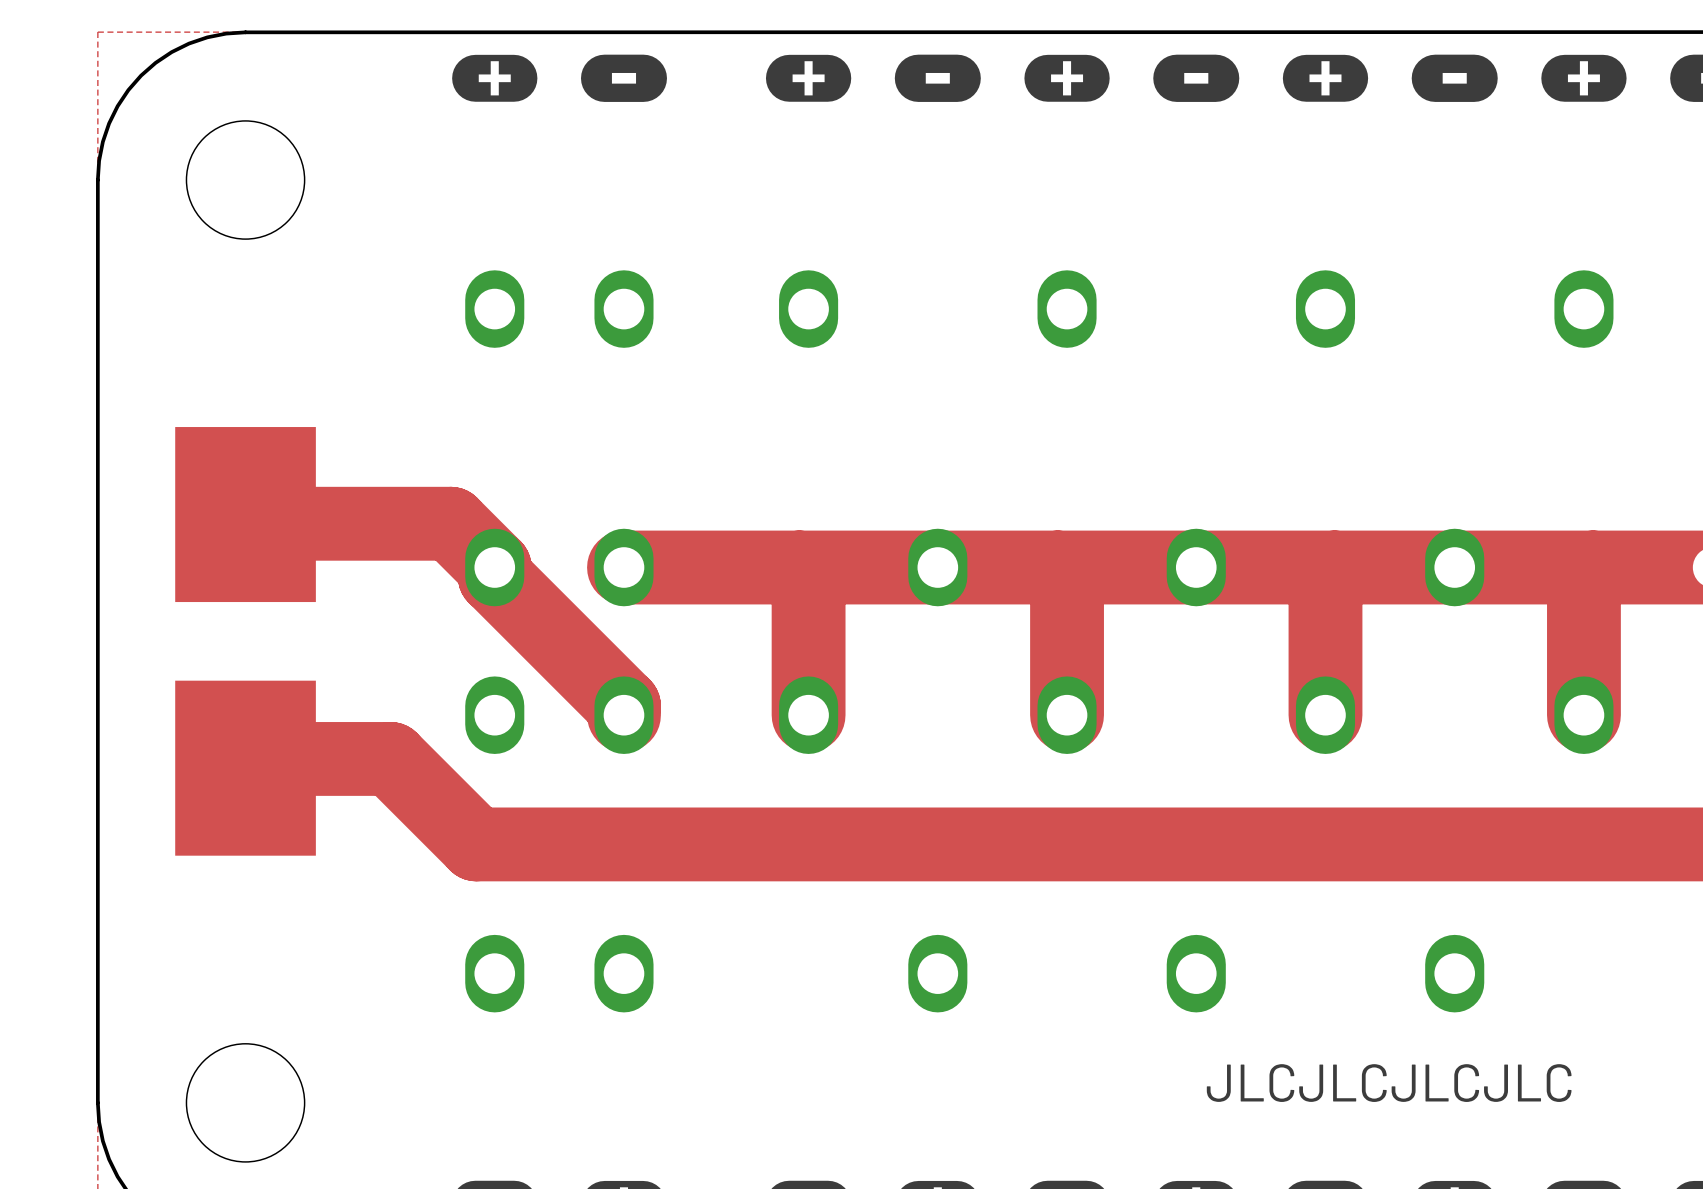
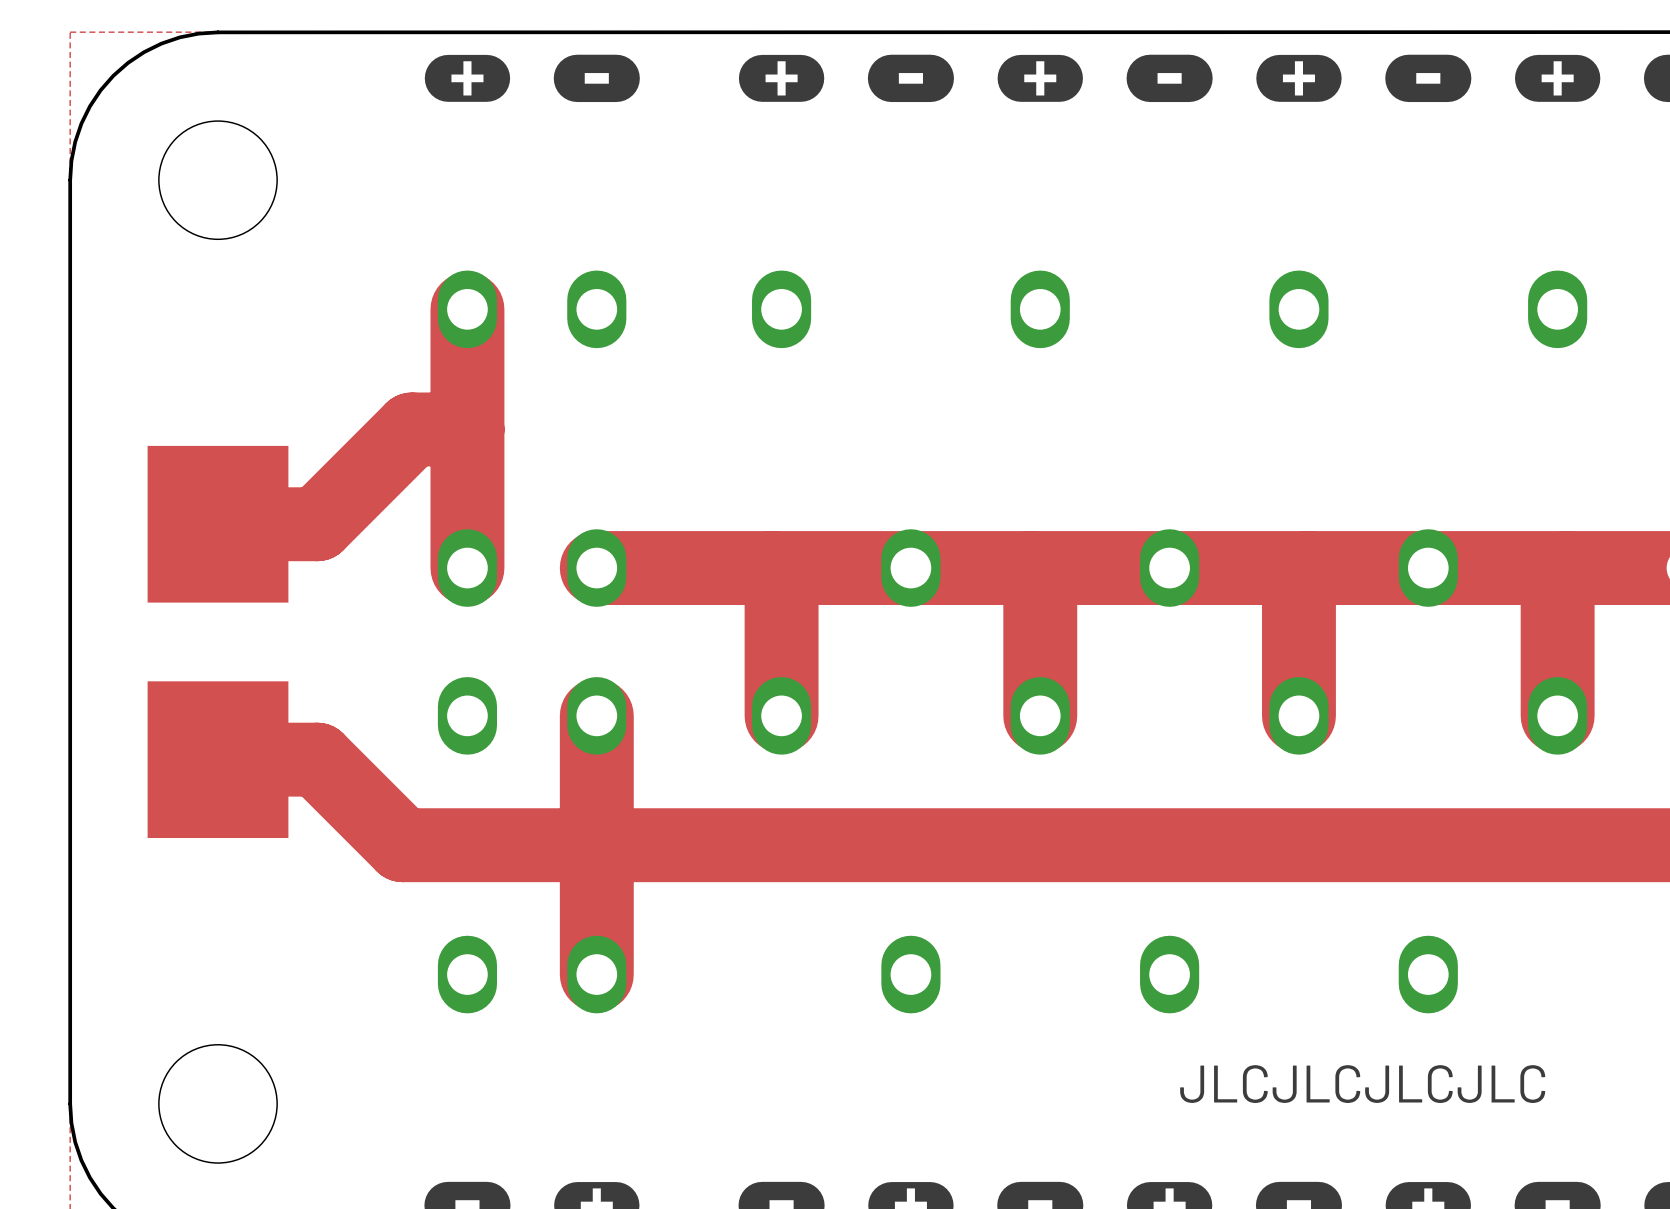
track: none -> (467, 309) (467, 568)
part footprint: [175, 427, 316, 856] -> [147, 445, 289, 839]
track: (344, 523) (451, 523) (494, 567) (494, 576) (623, 705) (623, 715) -> (317, 524) (412, 429) (467, 429)
track: none -> (596, 715) (596, 974)
track: (344, 758) (390, 758) (476, 844) -> (317, 759) (402, 845) (448, 845)

